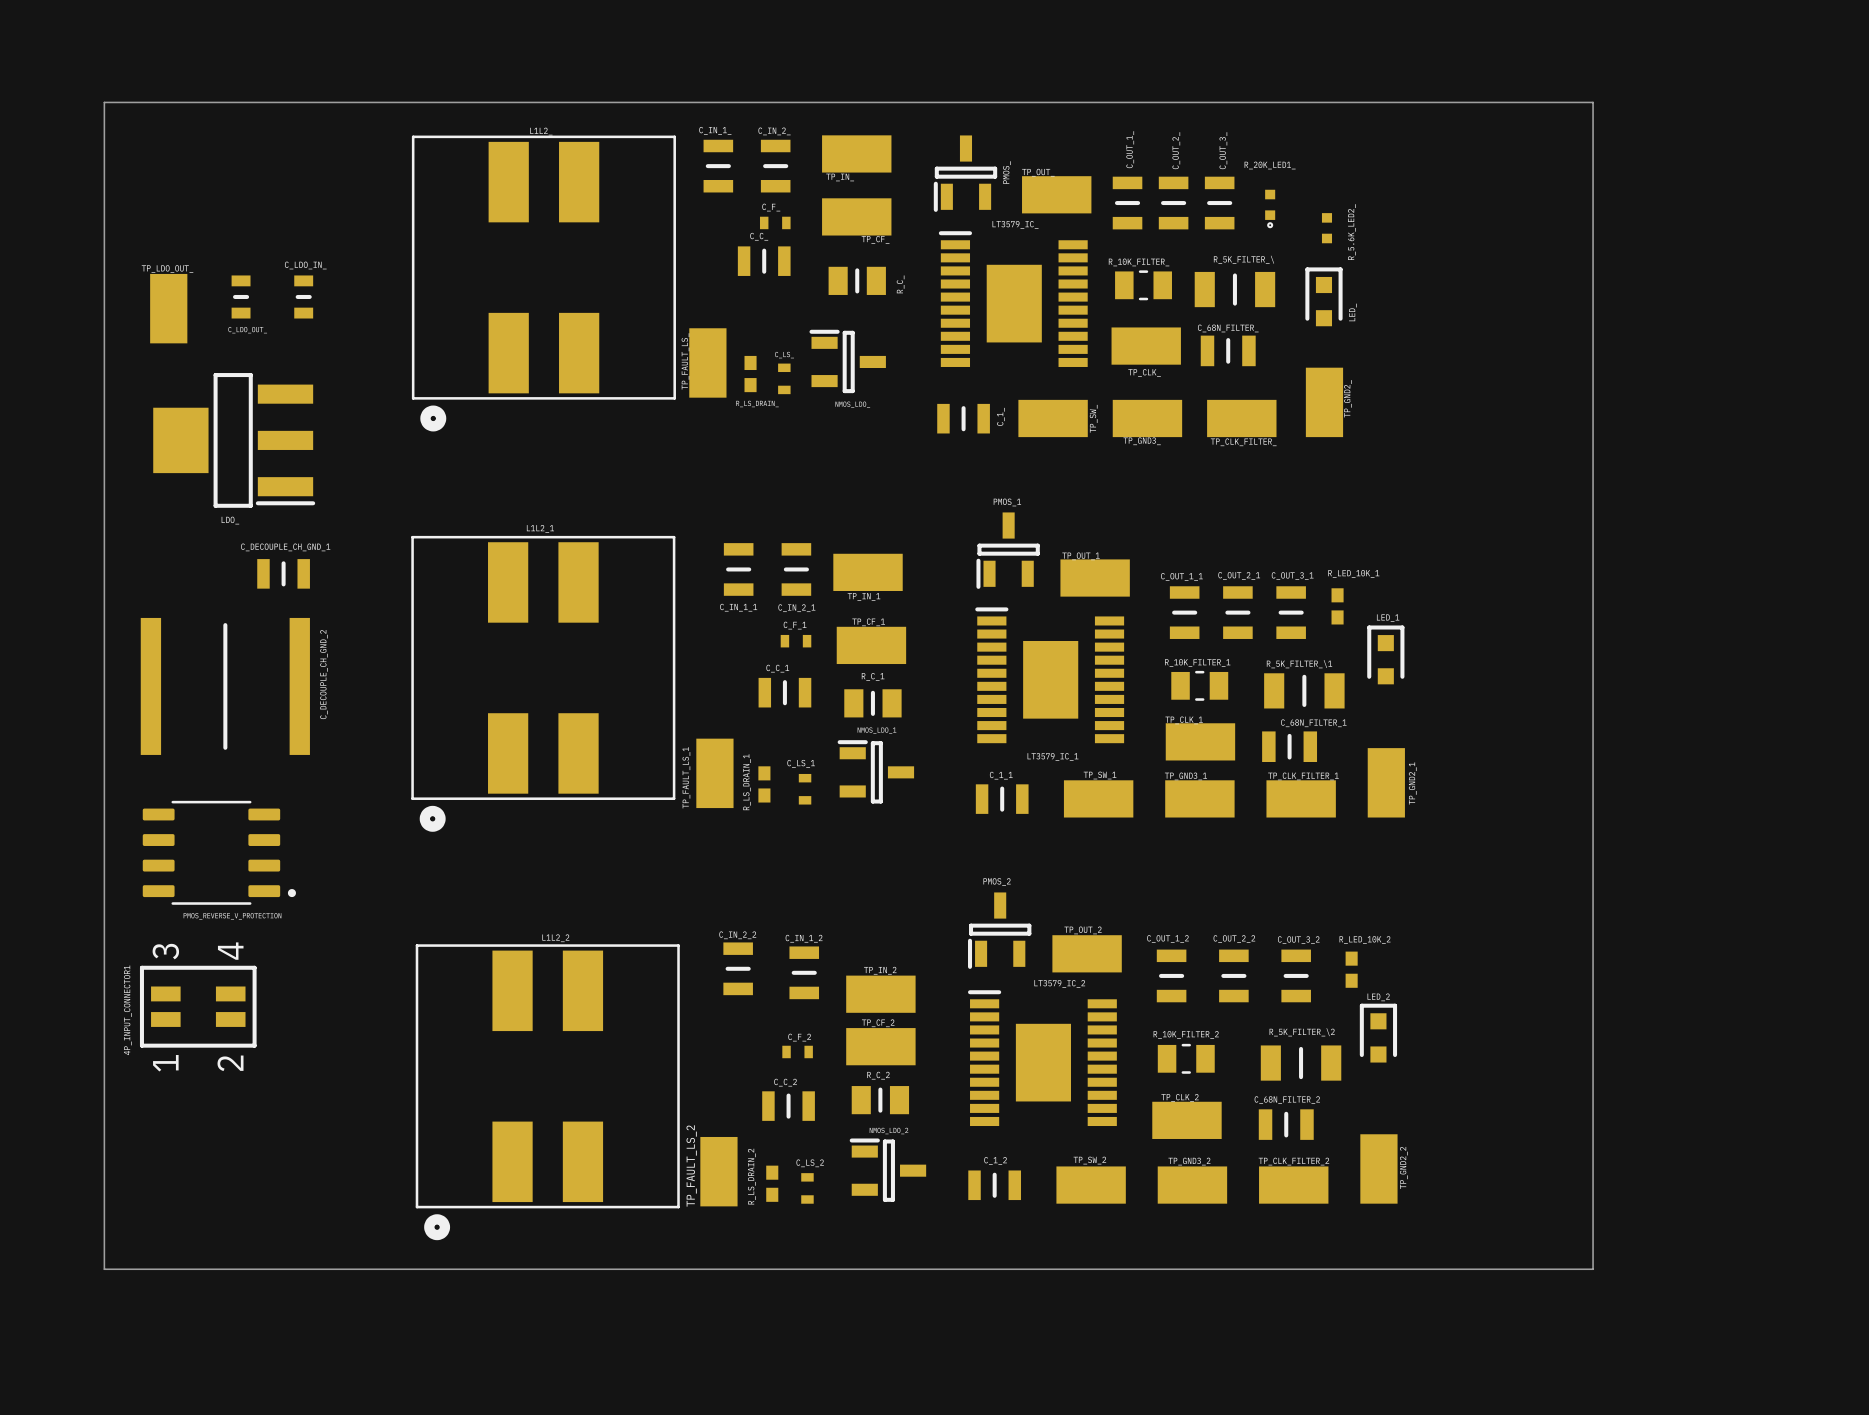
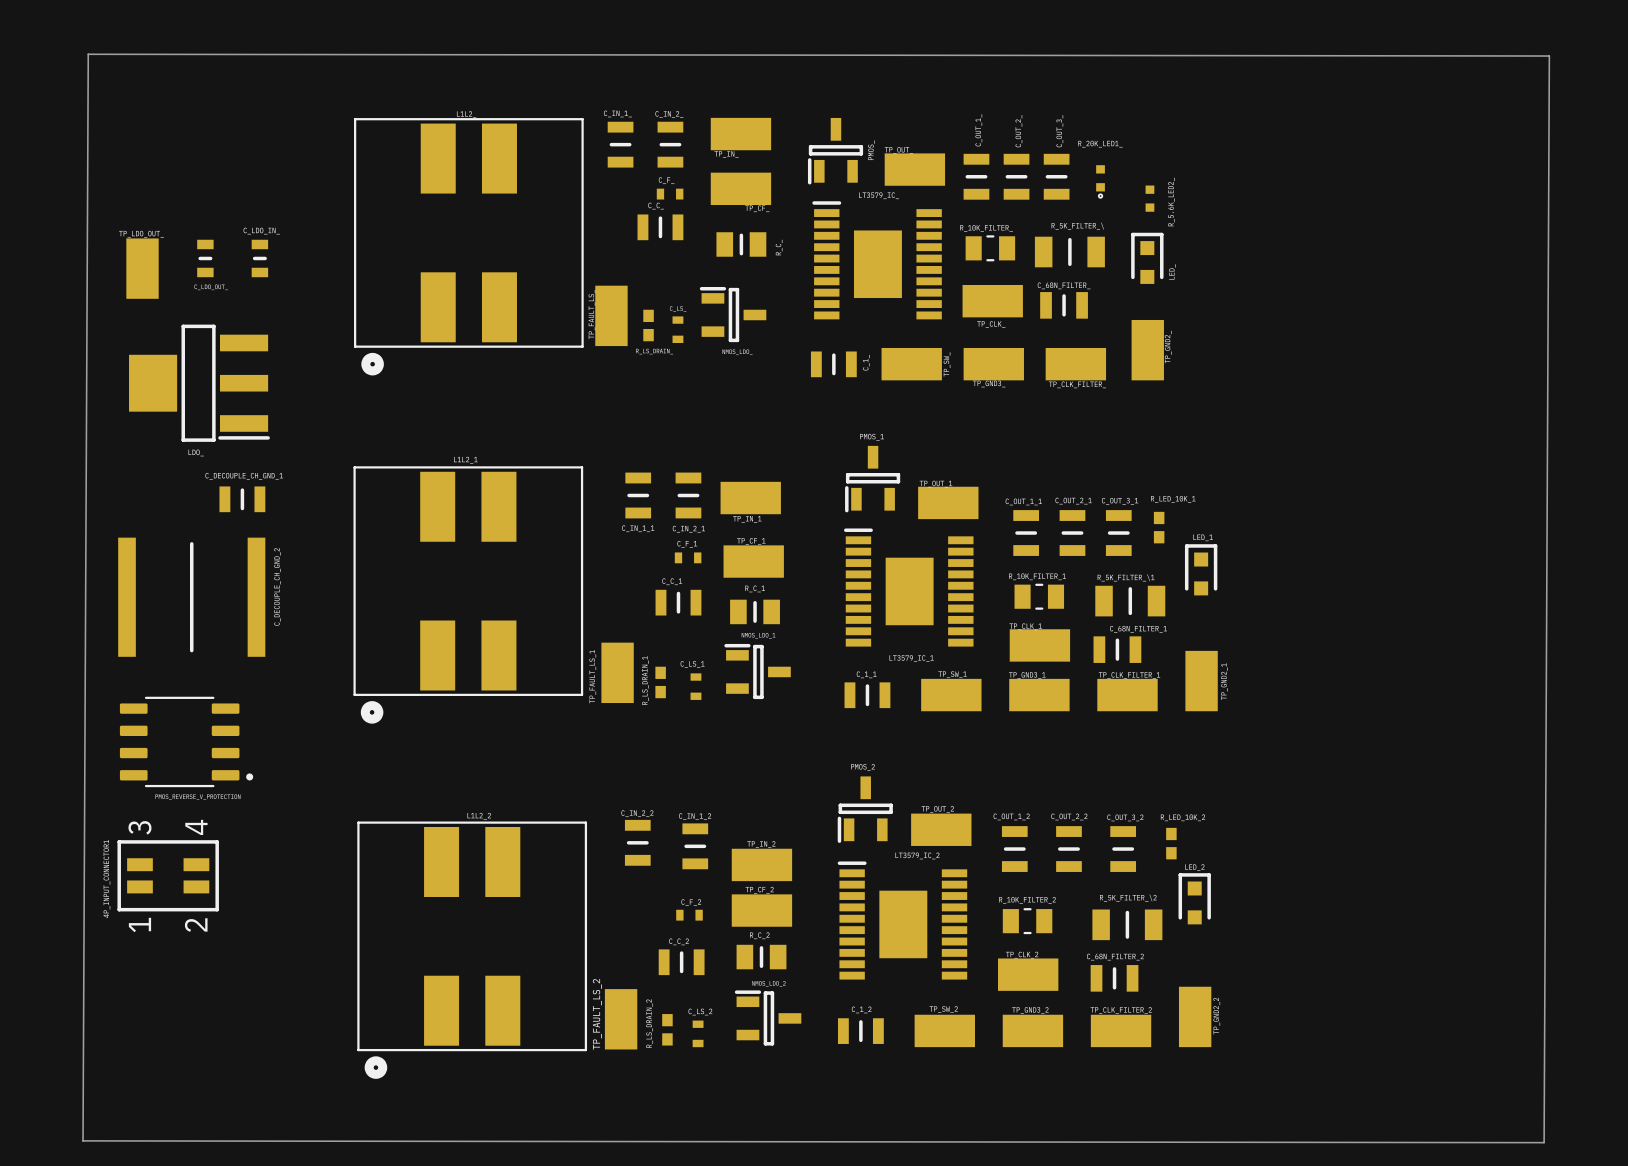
board edge: (104, 102) (1593, 102) (1593, 1269) (104, 1269) (104, 102) -> (88, 54) (83, 1140) (1544, 1142) (1549, 56) (88, 54)

